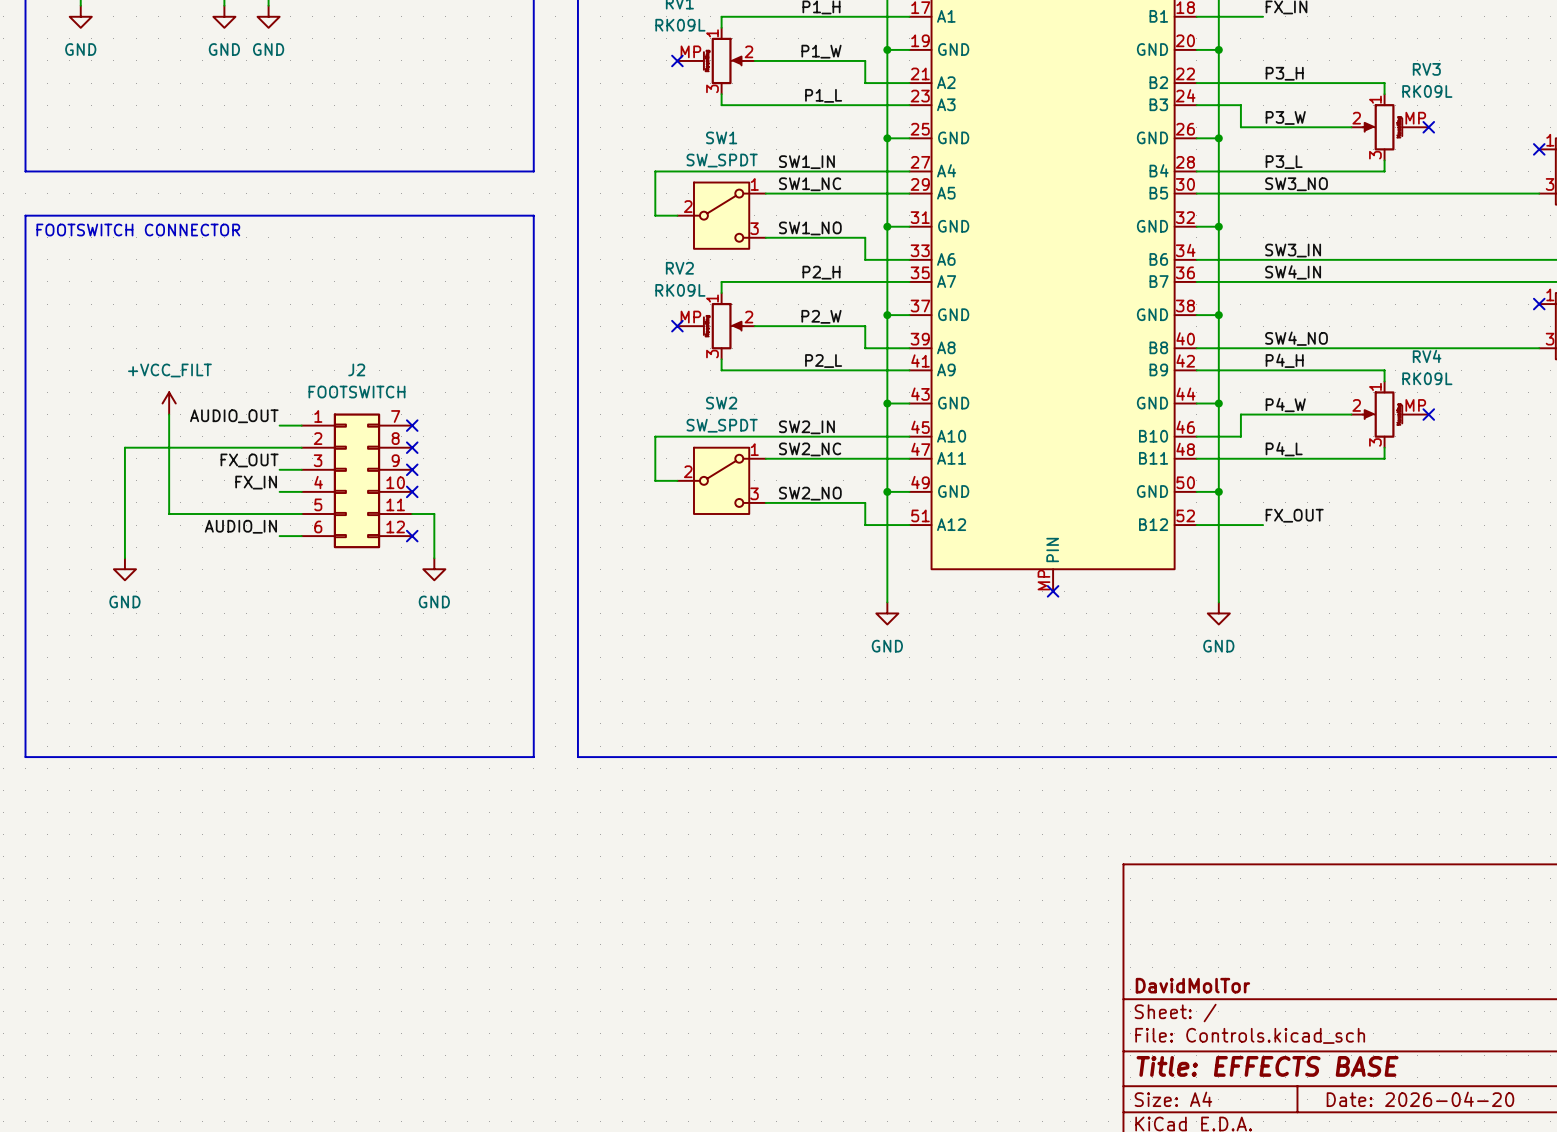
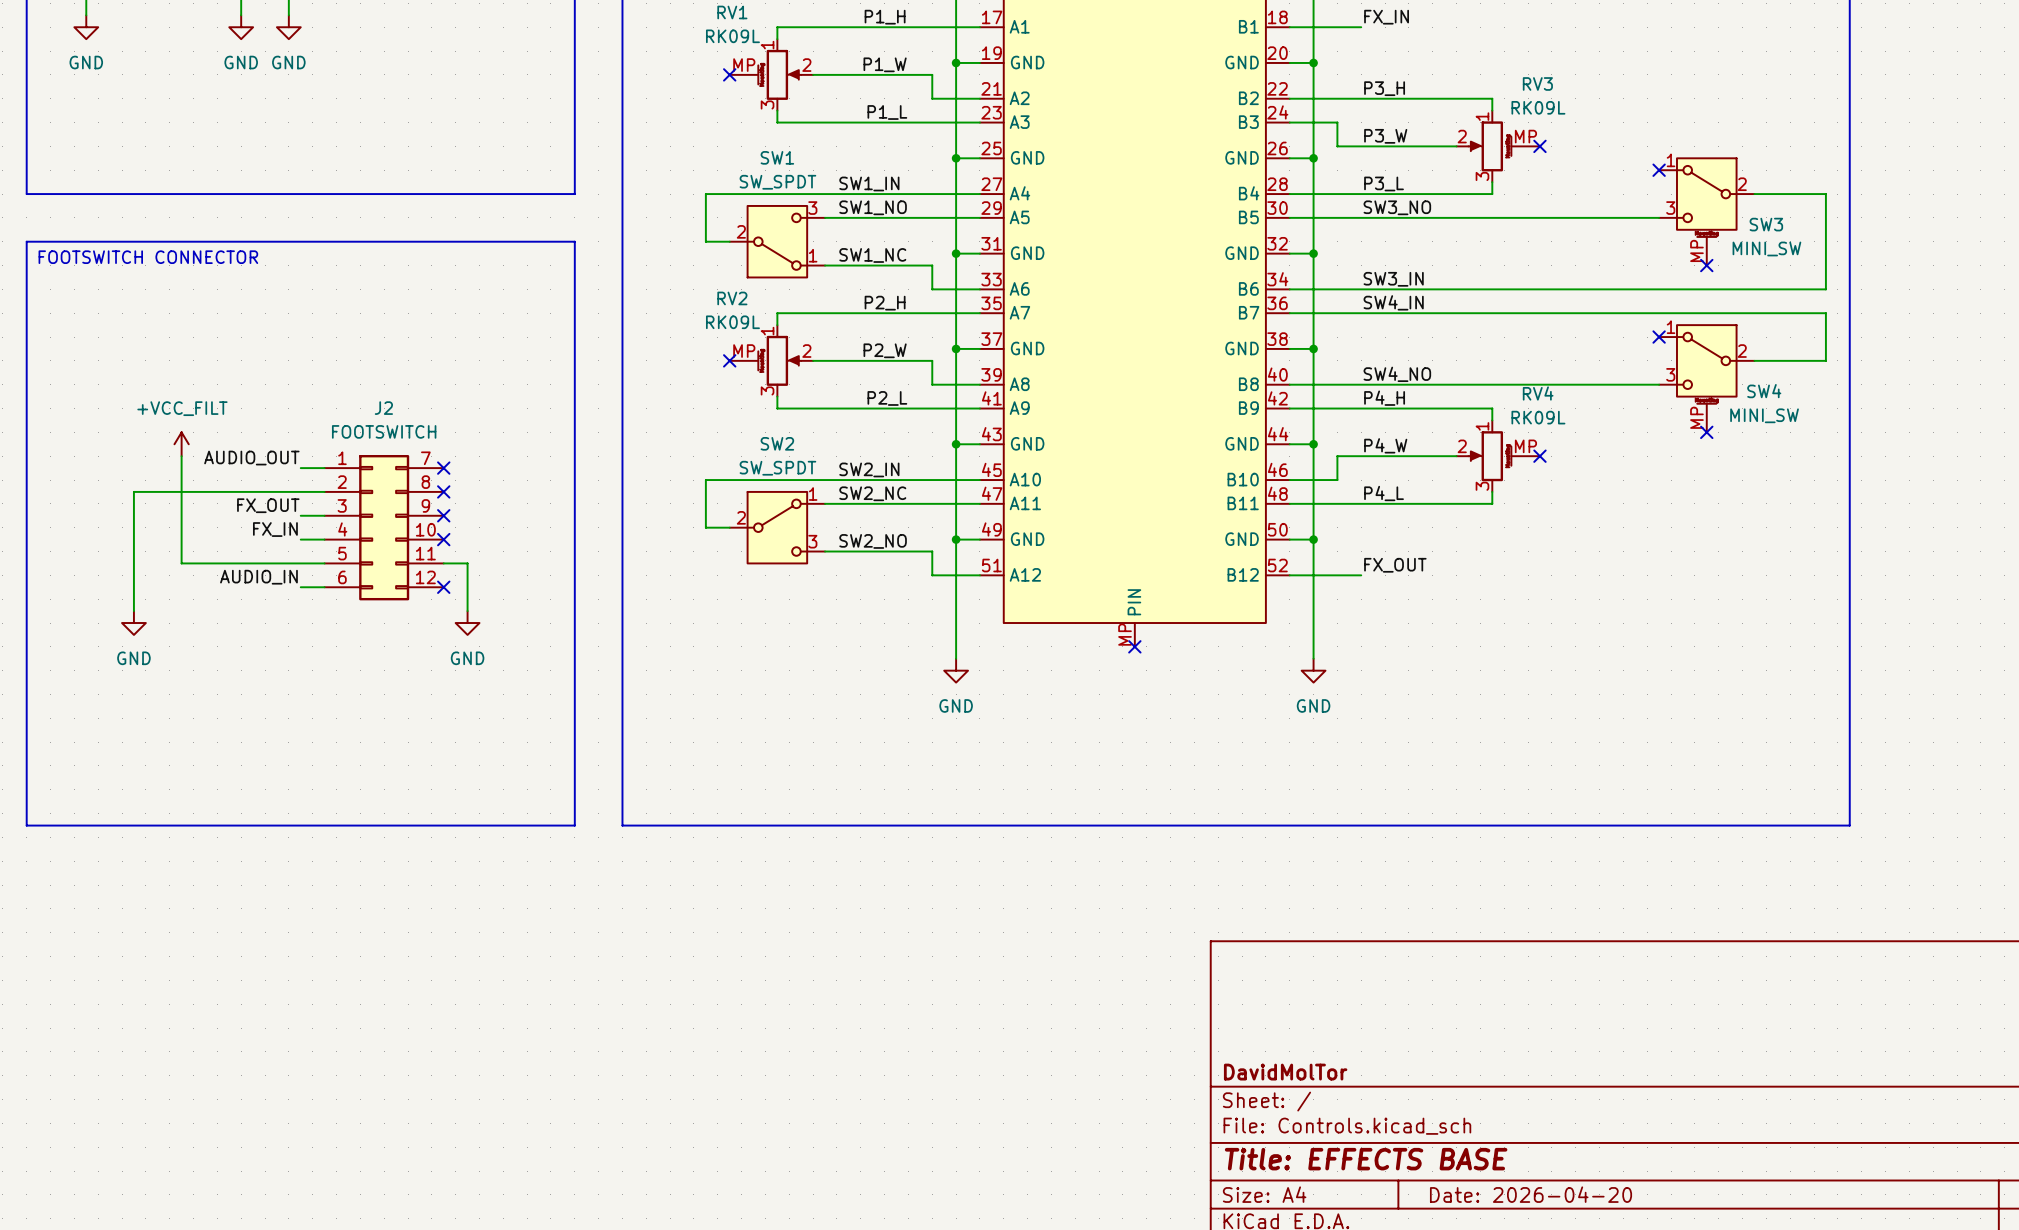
label: SW1_NC (810, 184) -> SW1_NO (873, 207)
SW1 flip: as is (721, 215) -> up-down (777, 241)
label: SW1_NO (810, 228) -> SW1_NC (872, 255)

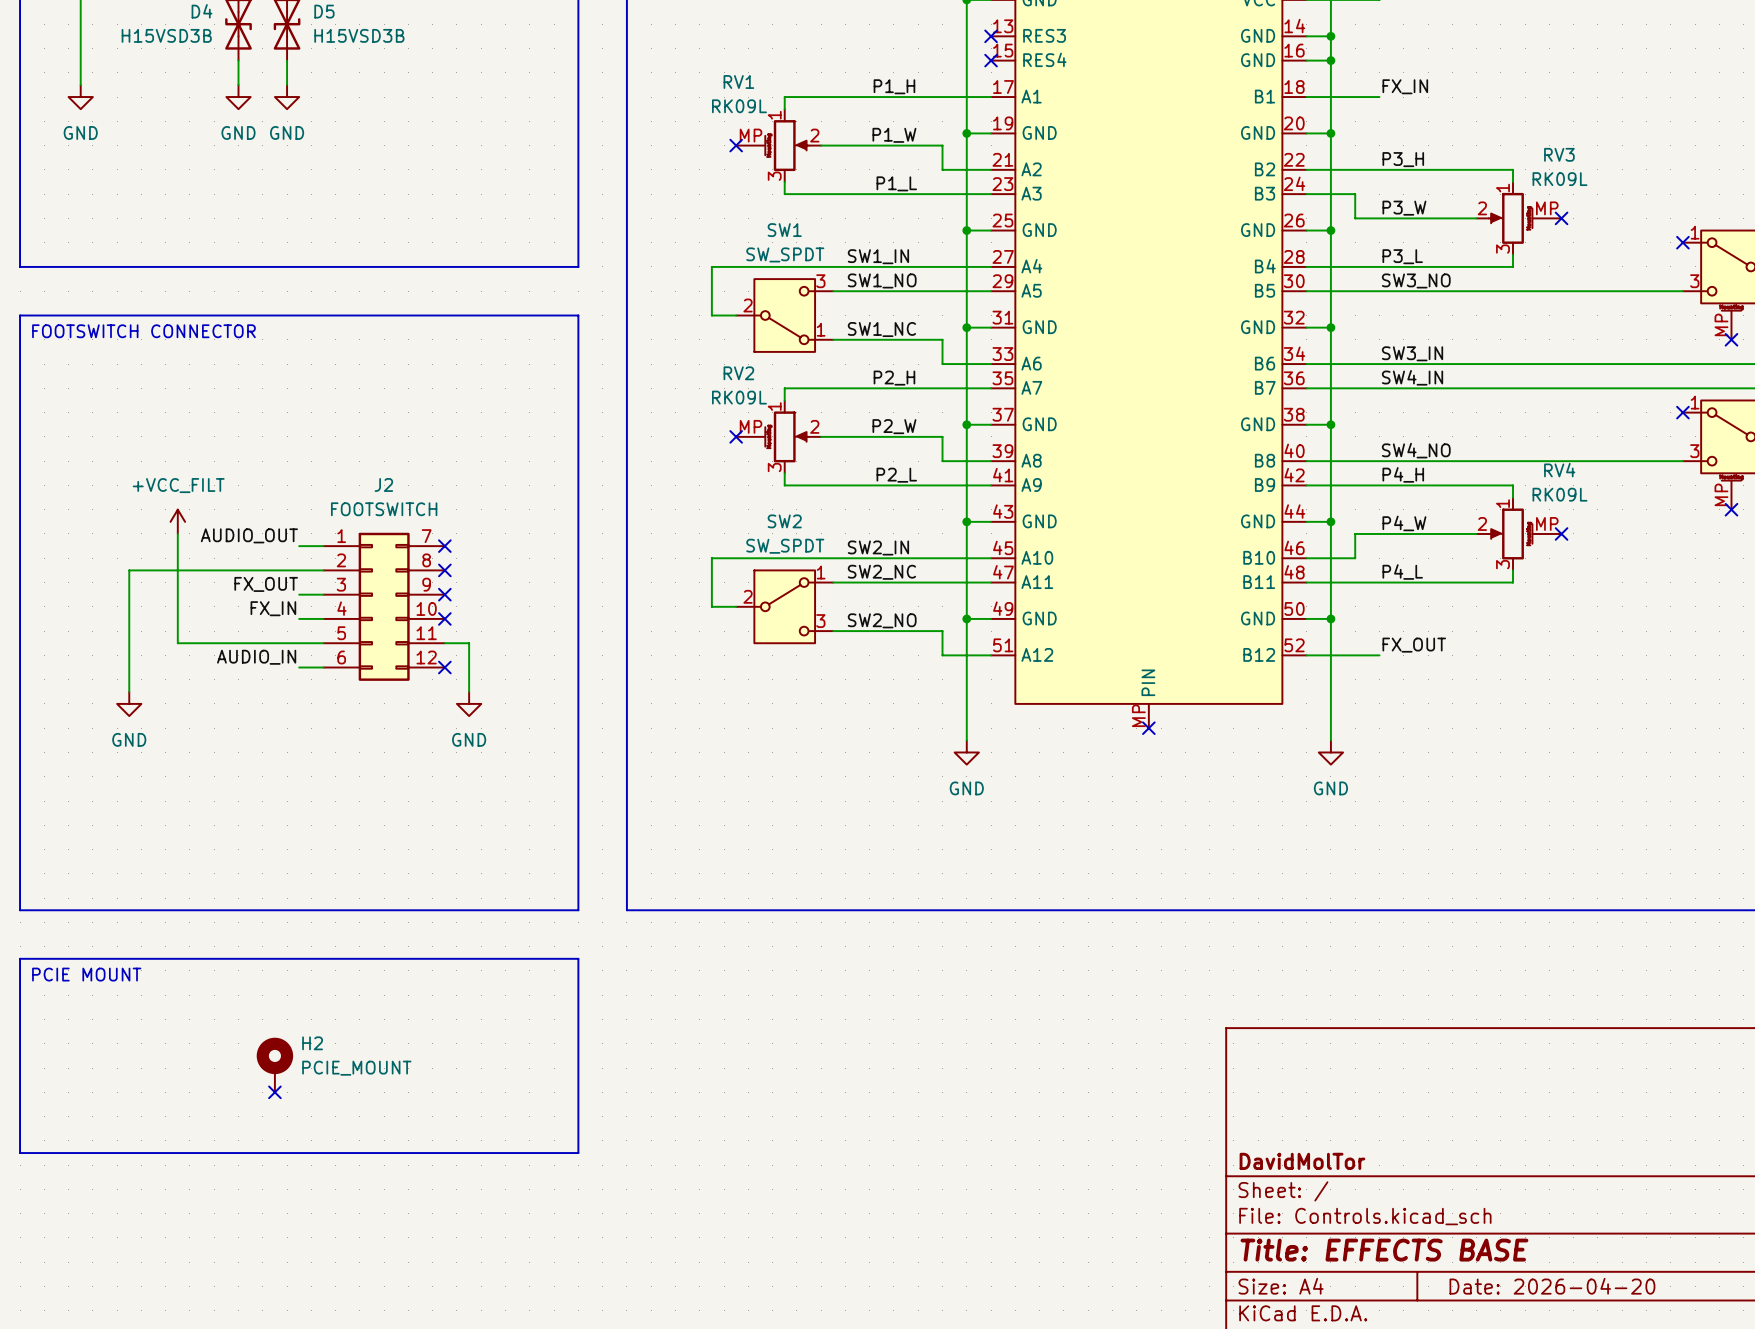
line: none -> (20, 958) (578, 958) (578, 1153) (20, 1153) (20, 958)
text: none -> PCIE MOUNT (86, 974)
H2: none -> PCIE_MOUNT (274, 1065)
no-connect mark: none -> (274, 1092)

